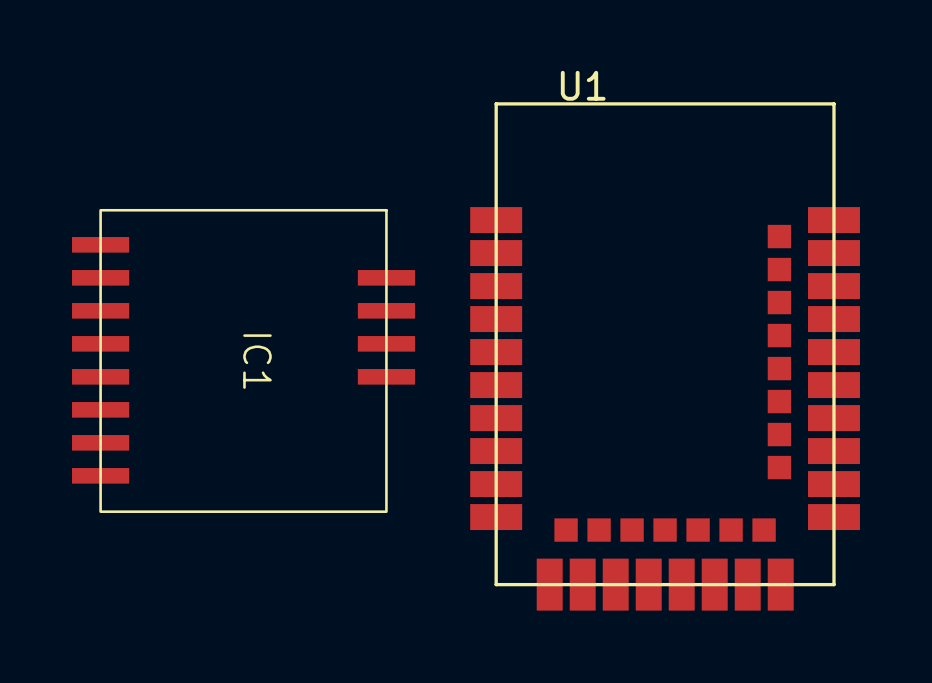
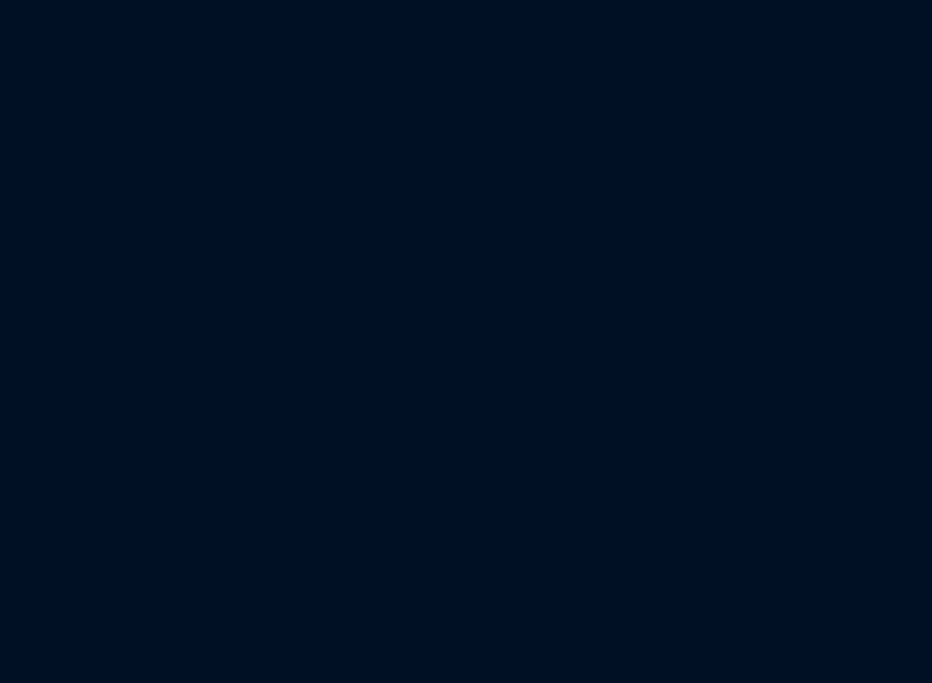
U1: (665, 356) -> none
IC1: (243, 360) -> none

